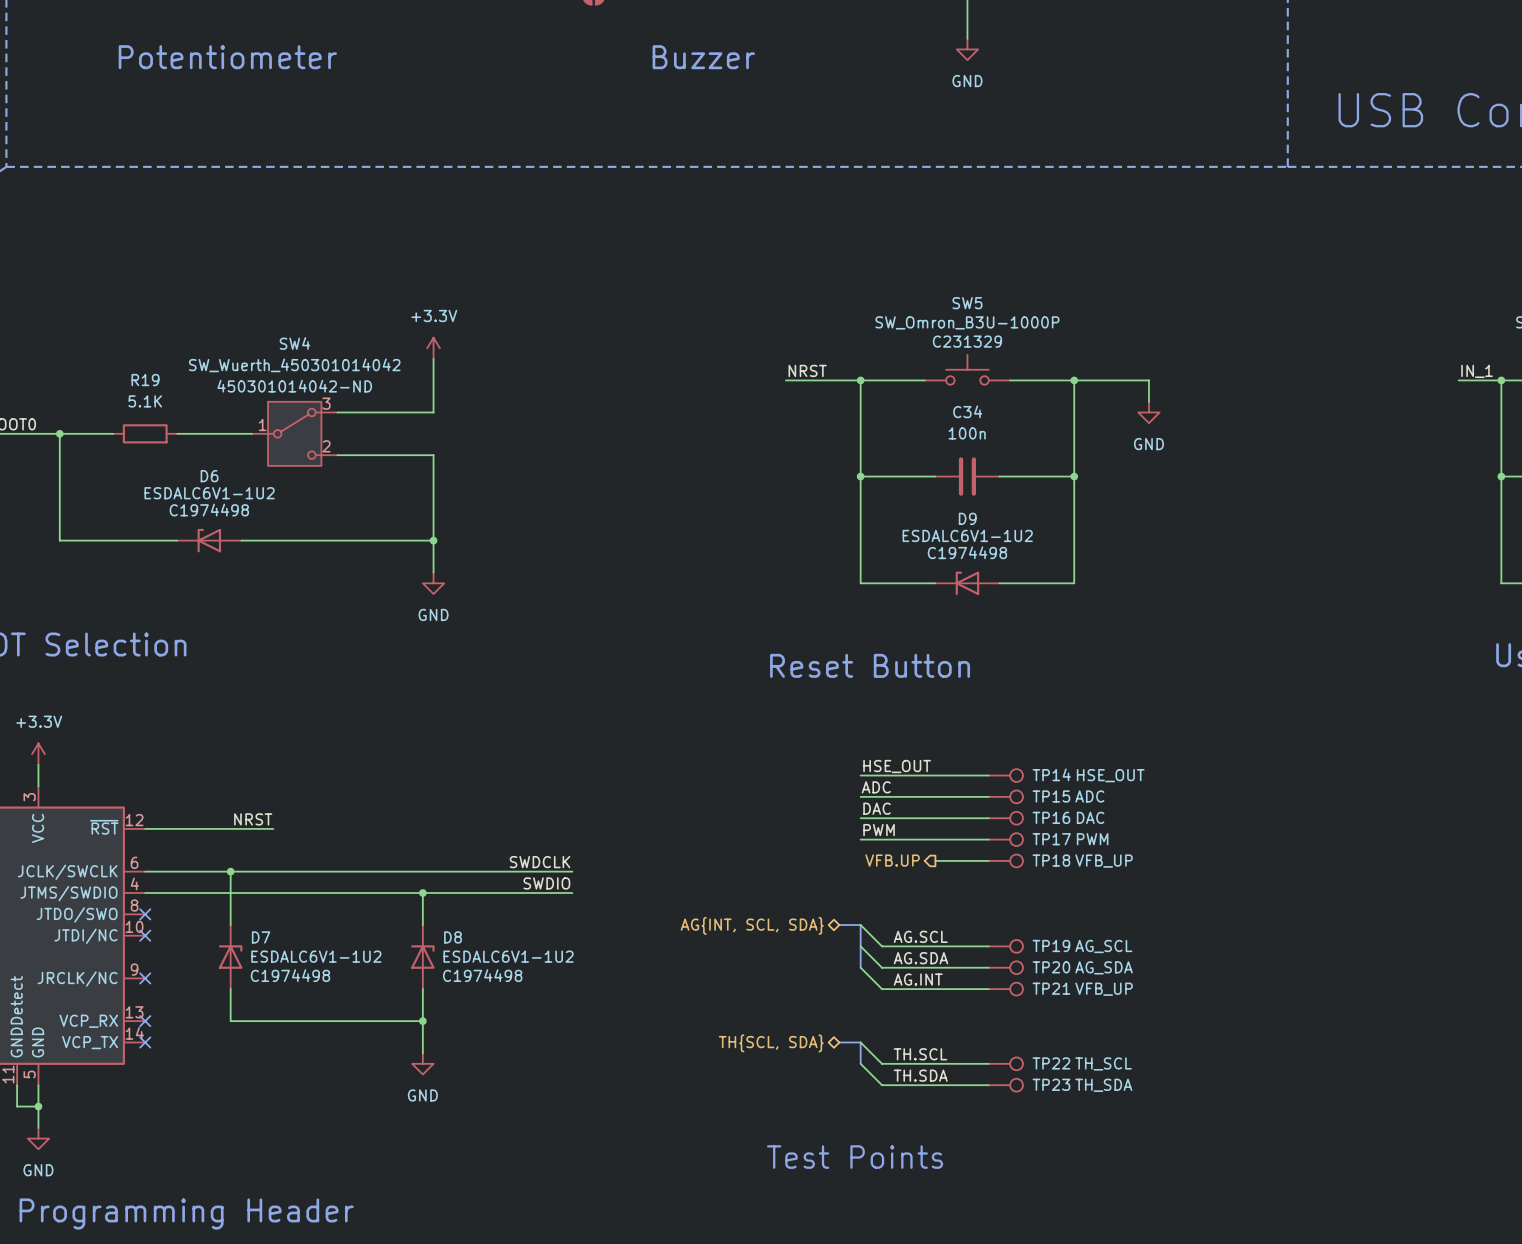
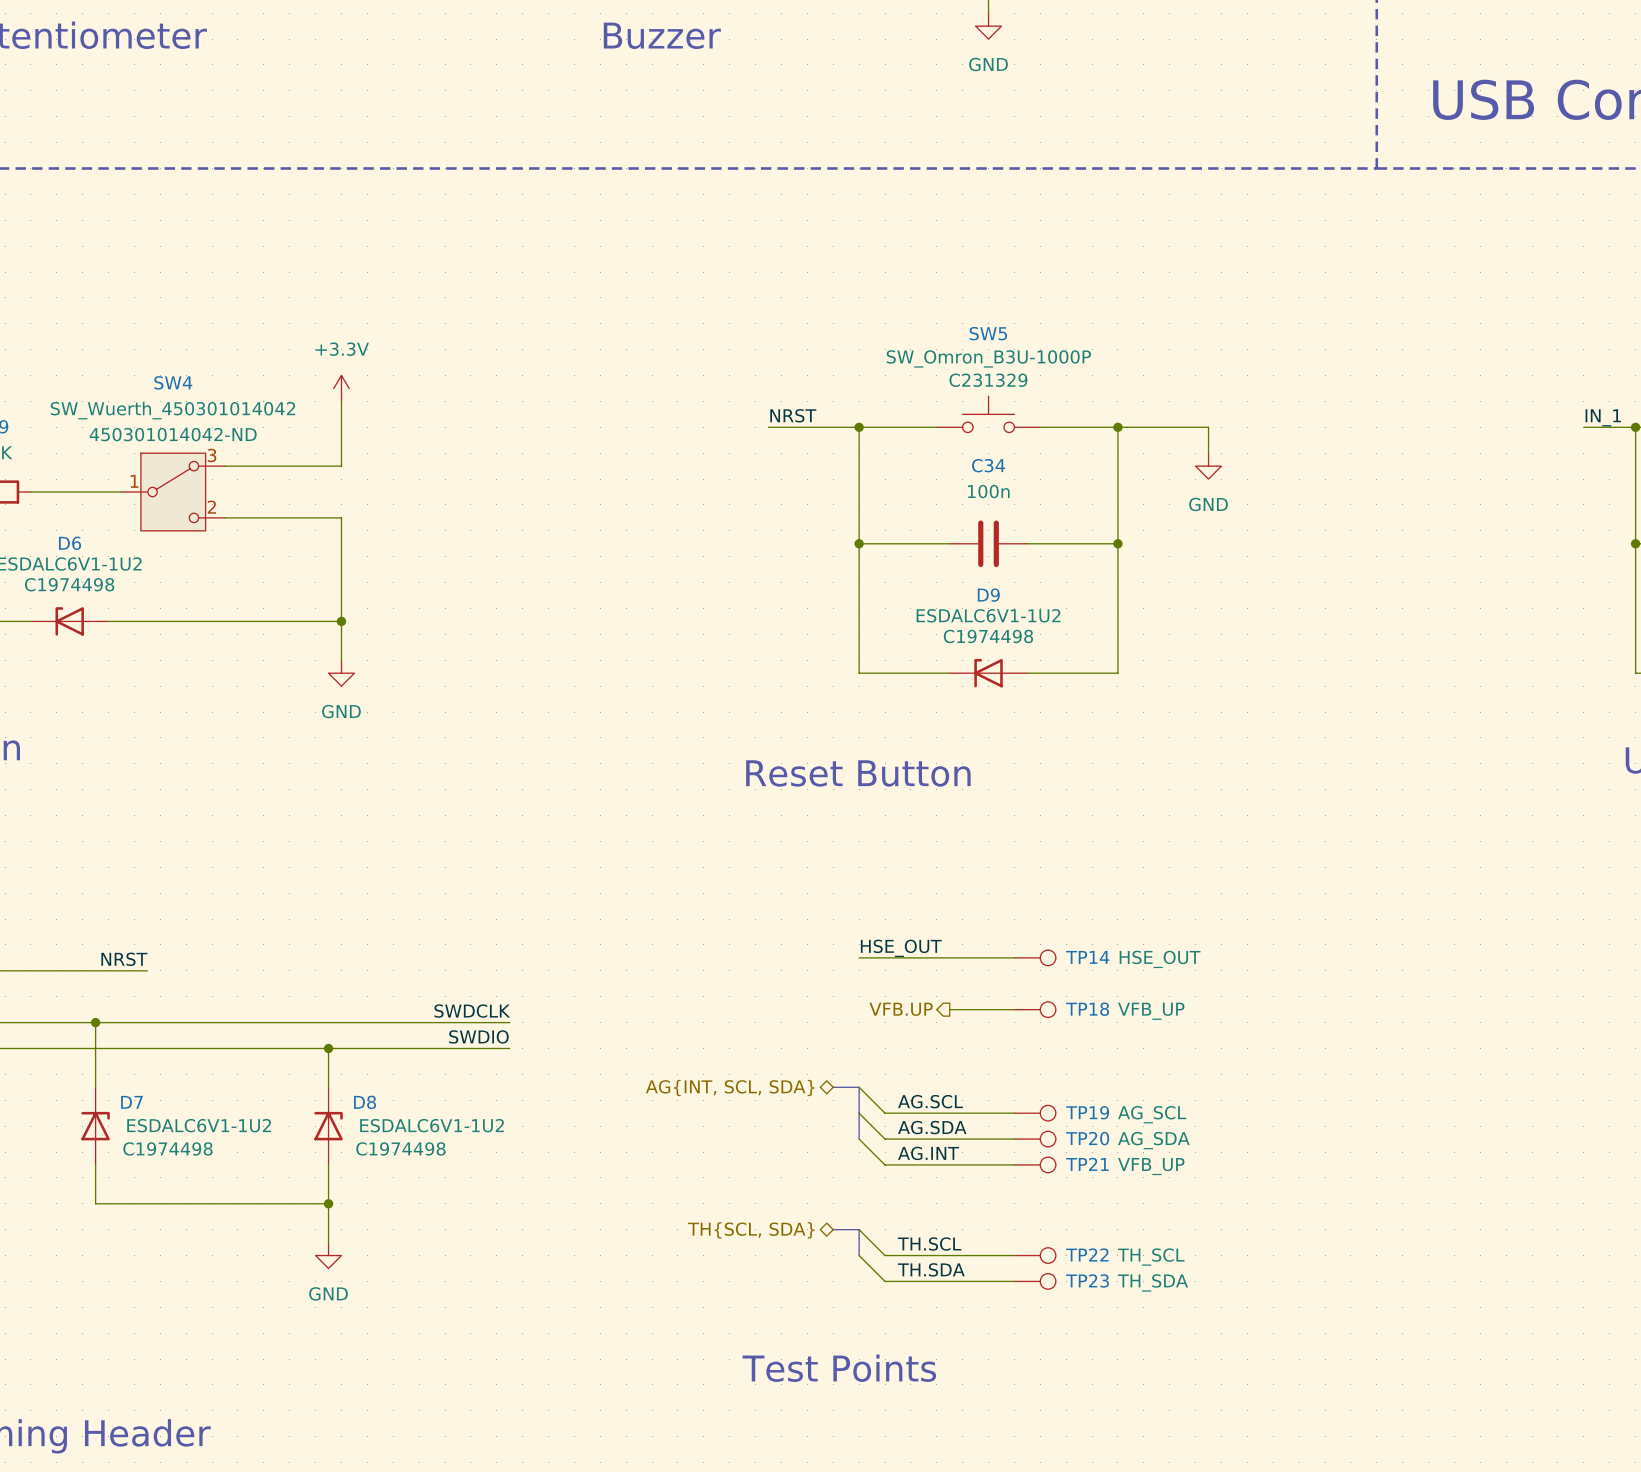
label: HSE_OUT (897, 766) -> none
wire: (860, 775) (988, 775) -> none
TP14: HSE_OUT (1005, 775) -> none
label: ADC (876, 787) -> none
wire: (860, 796) (988, 796) -> none
TP15: ADC (1005, 796) -> none
label: DAC (877, 808) -> HSE_OUT (901, 948)
TP16 name: TP16 (1051, 817) -> TP14 (1087, 957)
TP16 value: DAC (1090, 817) -> HSE_OUT (1160, 959)
label: PWM (879, 830) -> none
wire: (860, 839) (988, 839) -> none
TP17: PWM (1005, 839) -> none

